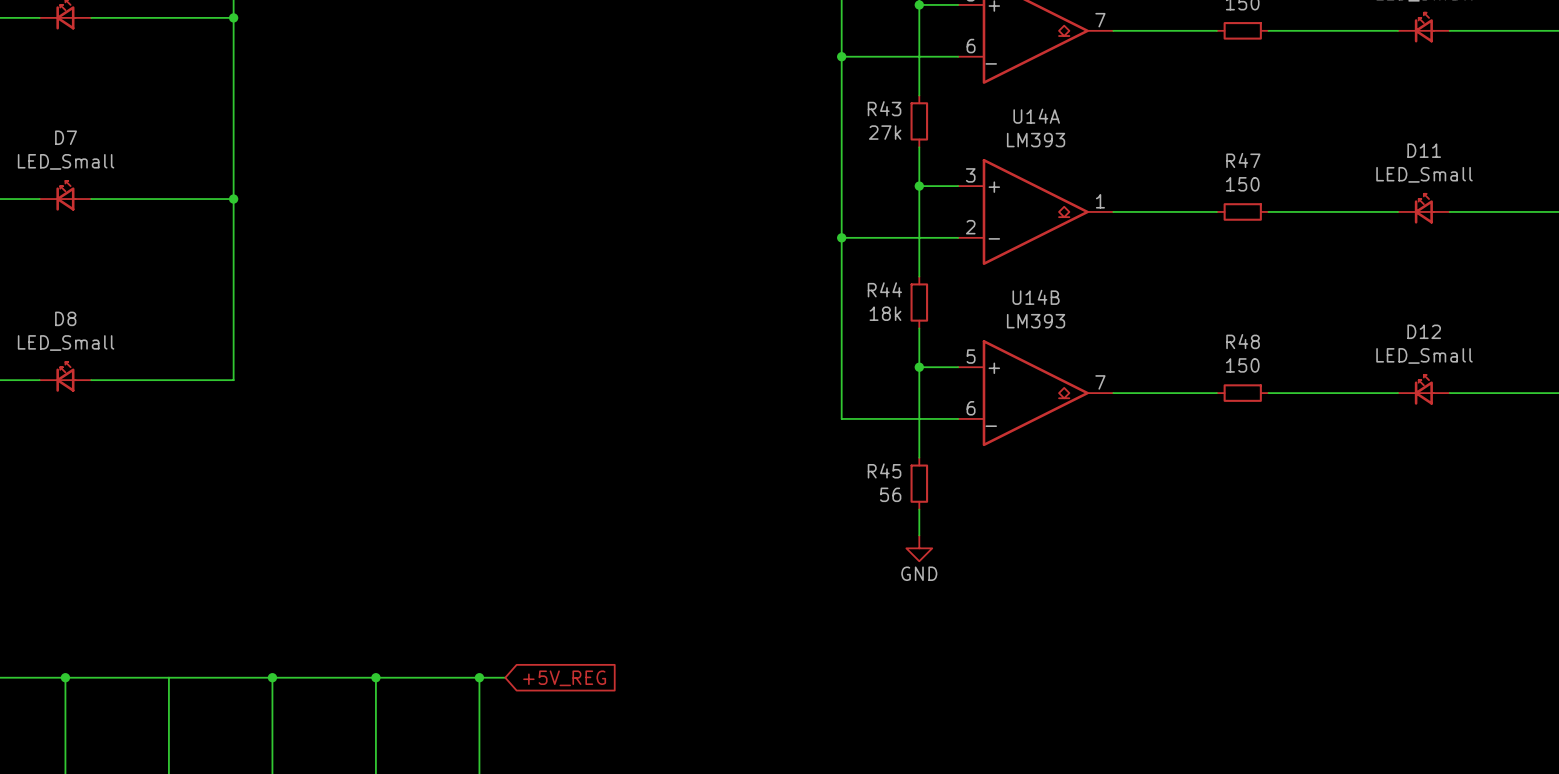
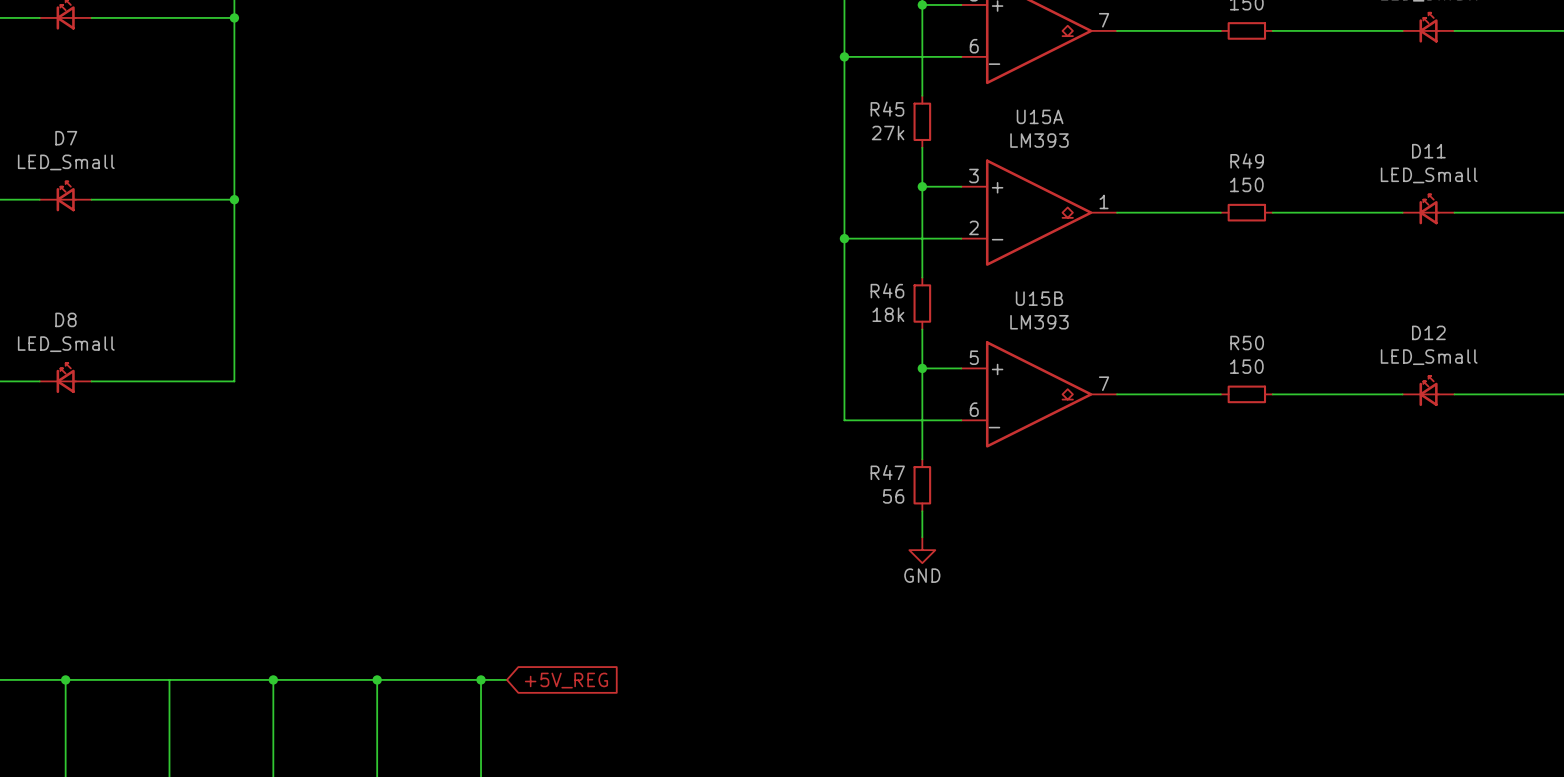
R43 name: R43 (884, 108) -> R45 (887, 109)
U14A name: U14A (1036, 116) -> U15A (1040, 116)
R47 name: R47 (1243, 160) -> R49 (1247, 160)
R44 name: R44 (884, 289) -> R46 (887, 290)
U14B name: U14B (1036, 297) -> U15B (1039, 298)
R48 name: R48 (1243, 341) -> R50 (1247, 343)
R45 name: R45 (884, 470) -> R47 (887, 472)

